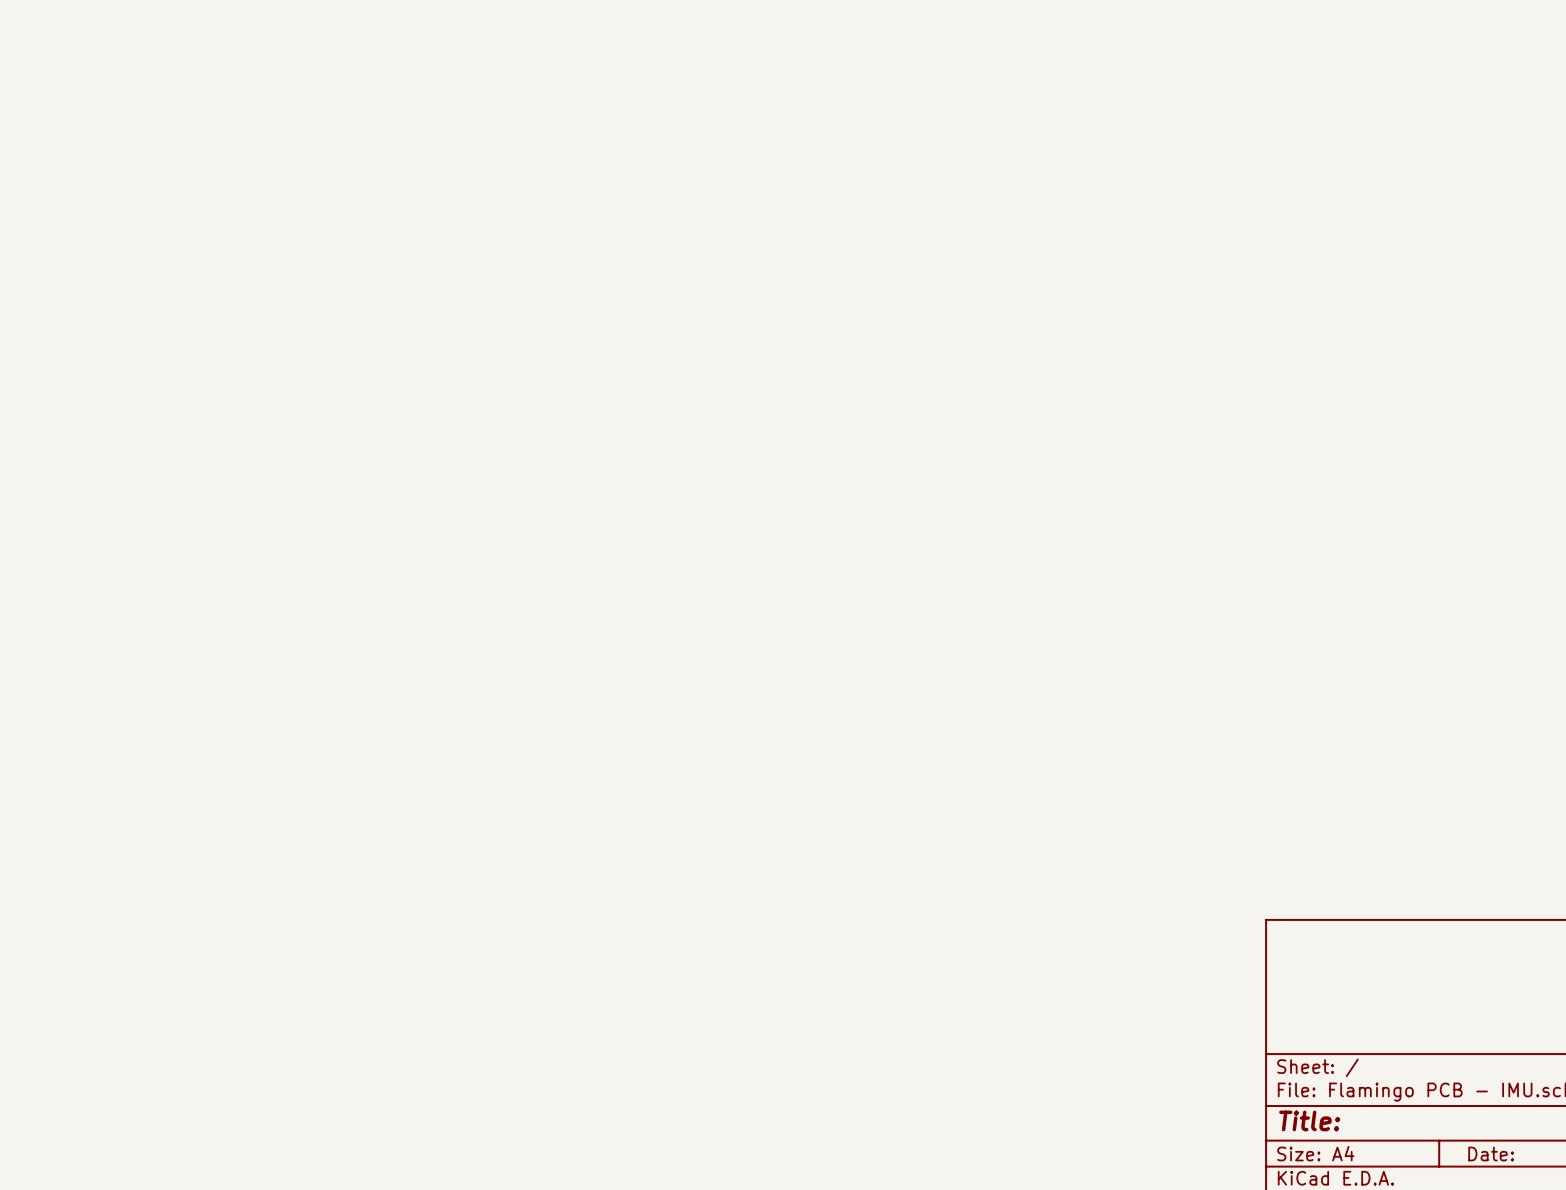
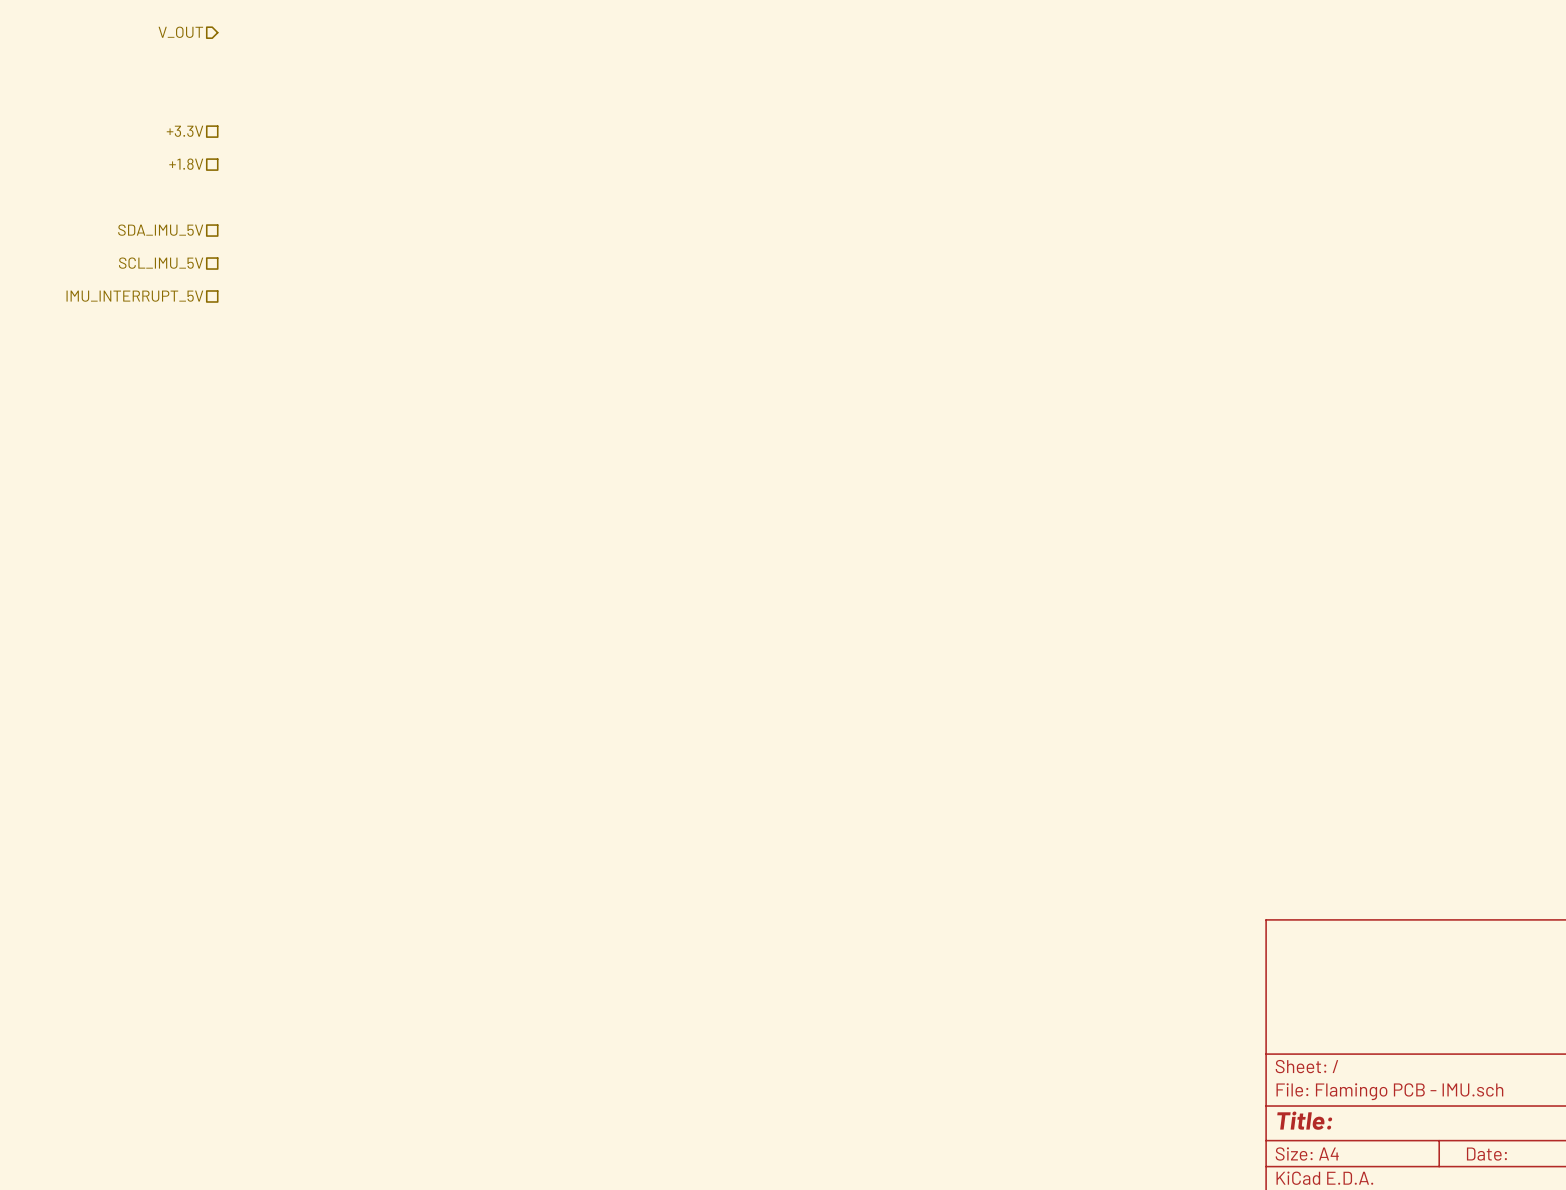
hierarchical label: none -> V_OUT (180, 32)
hierarchical label: none -> +3.3V (185, 131)
hierarchical label: none -> +1.8V (186, 164)
hierarchical label: none -> SDA_IMU_5V (160, 230)
hierarchical label: none -> SCL_IMU_5V (161, 263)
hierarchical label: none -> IMU_INTERRUPT_5V (134, 296)

